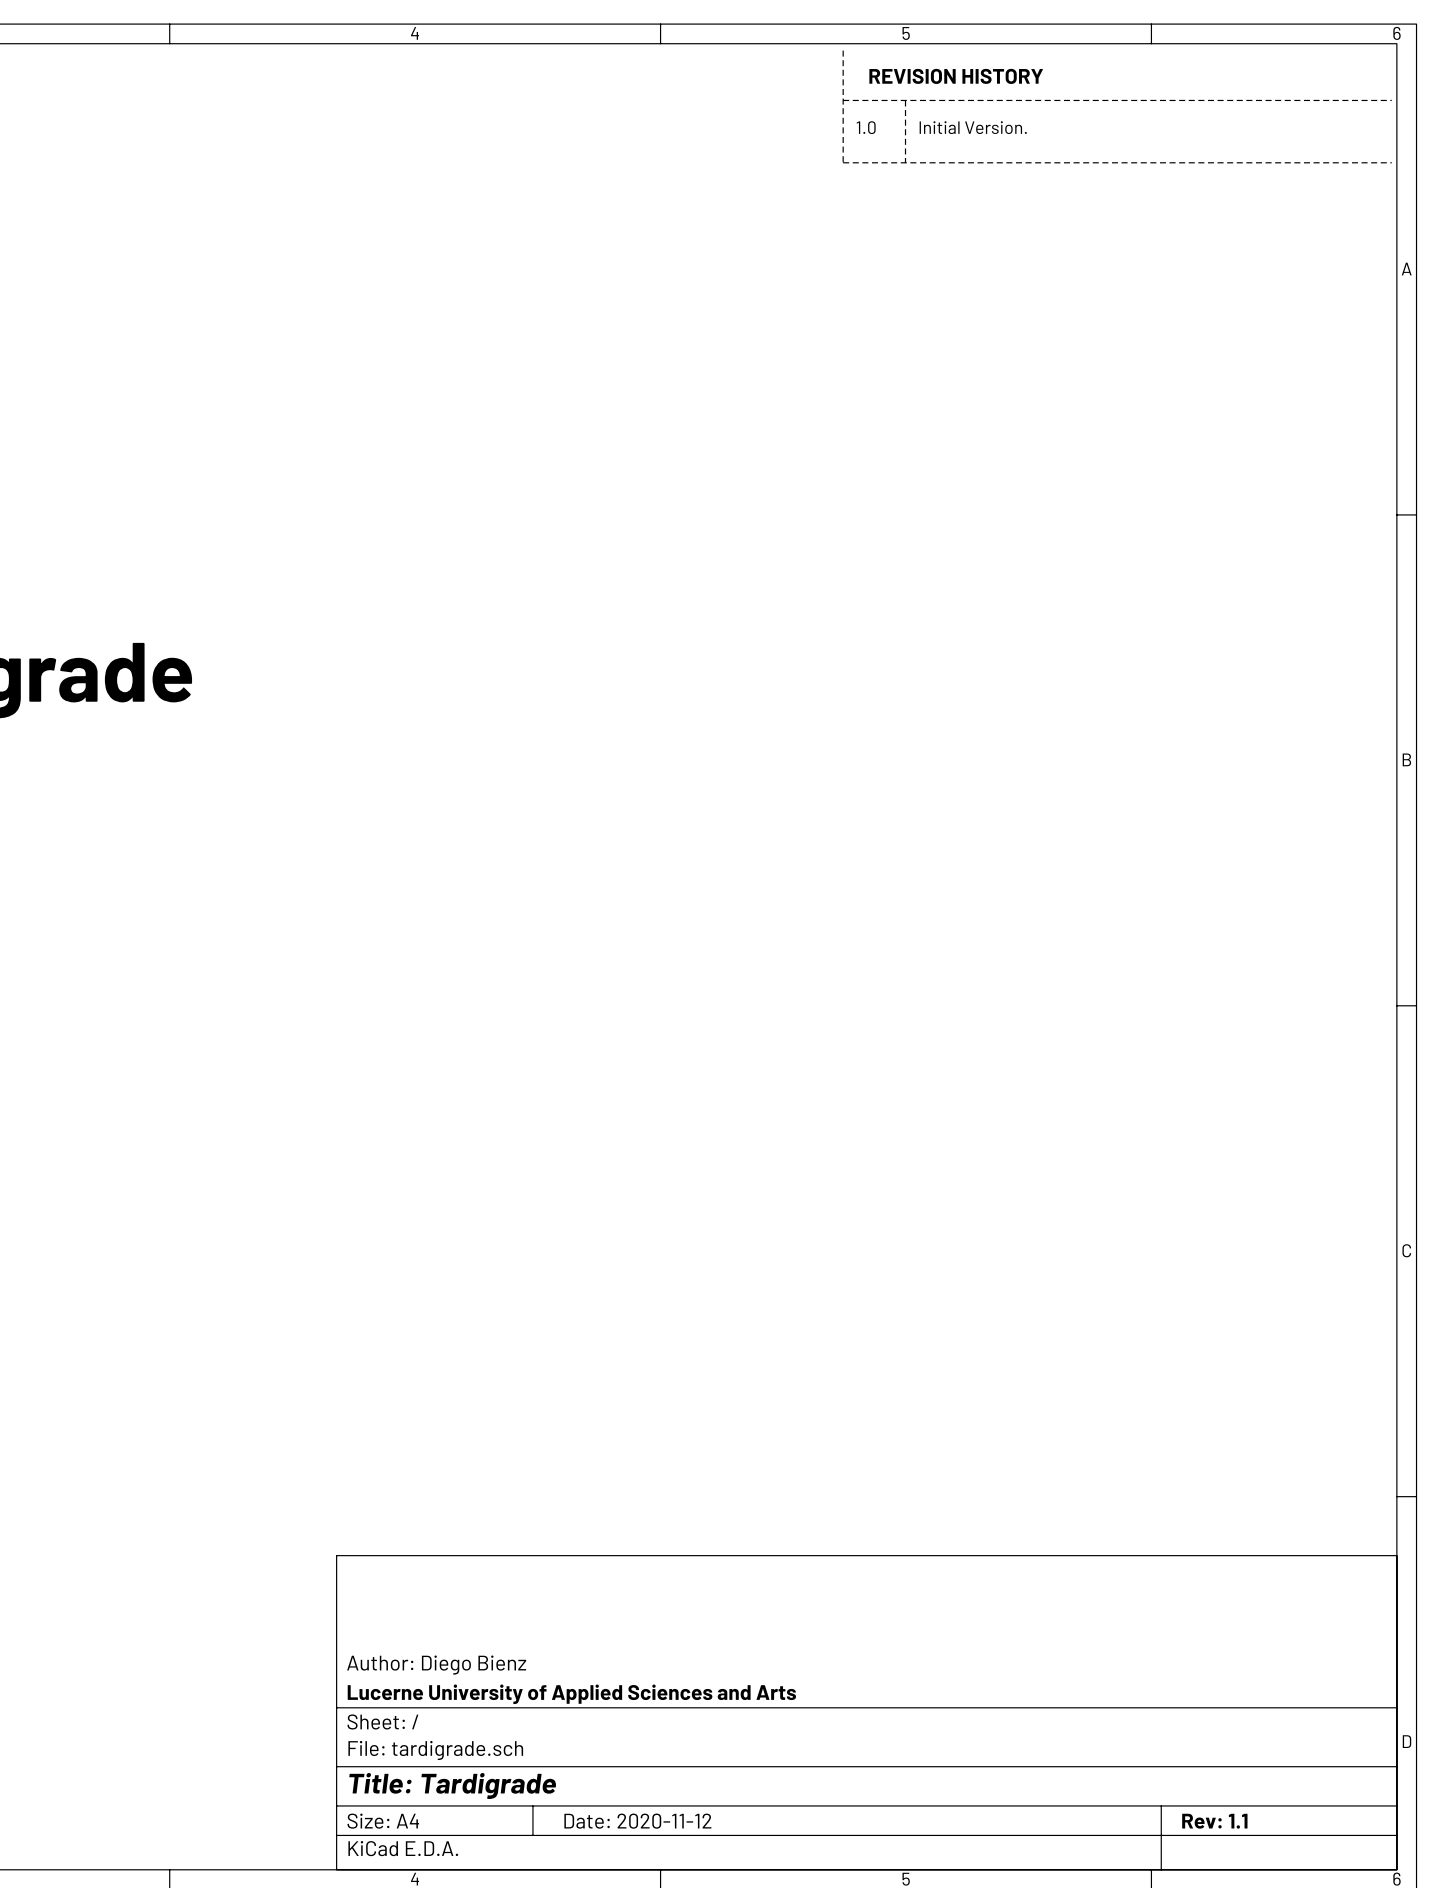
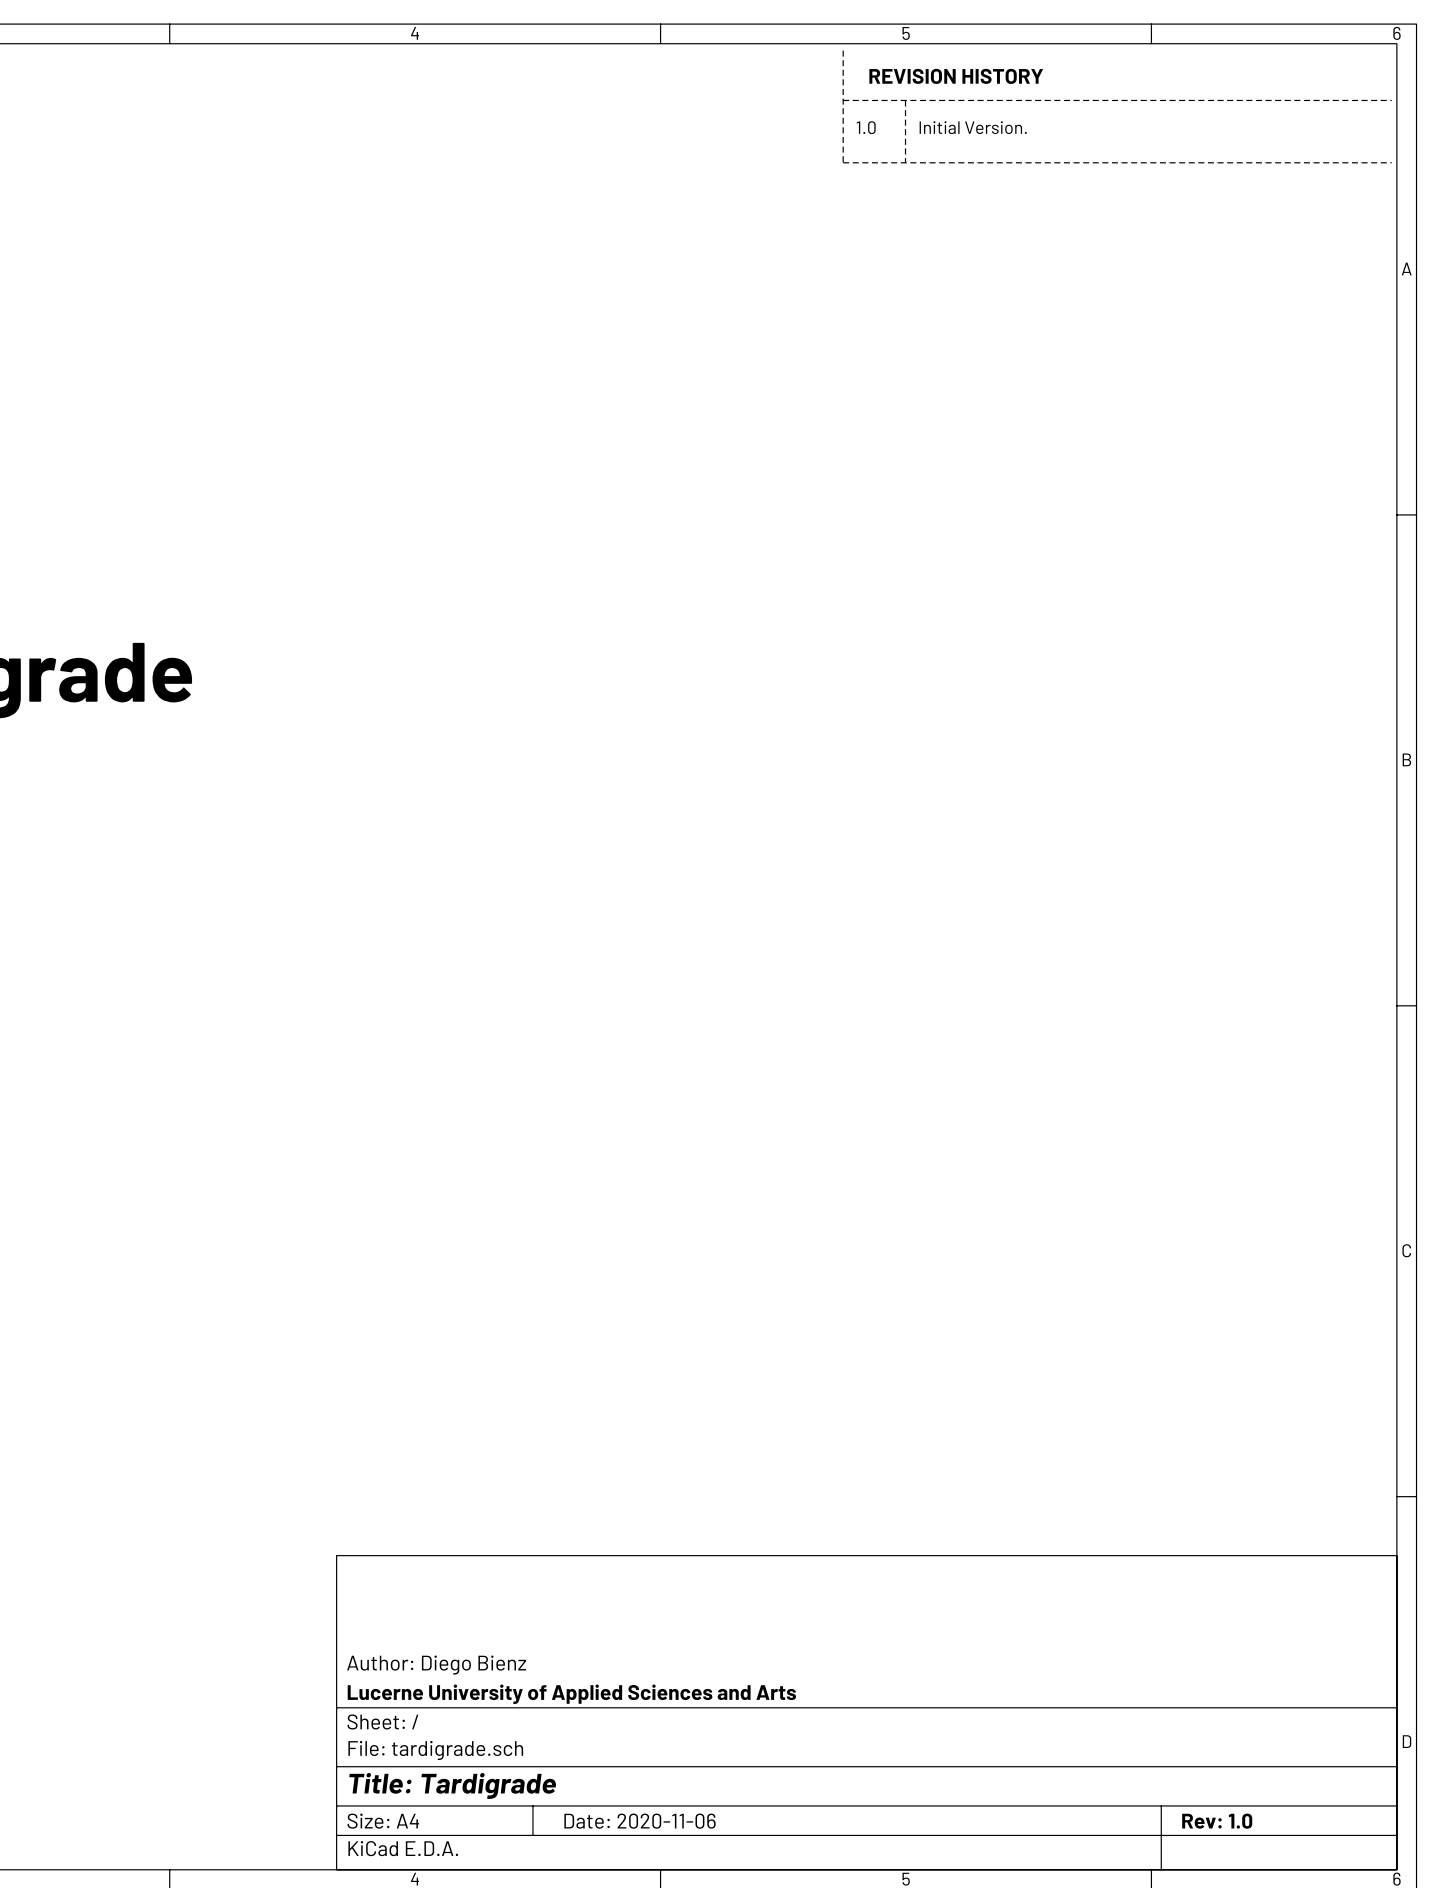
title block: Date: 2020-11-12 (637, 1821) -> Date: 2020-11-06 (640, 1821)
title block: Rev: 1.1 (1214, 1821) -> Rev: 1.0 (1217, 1821)

